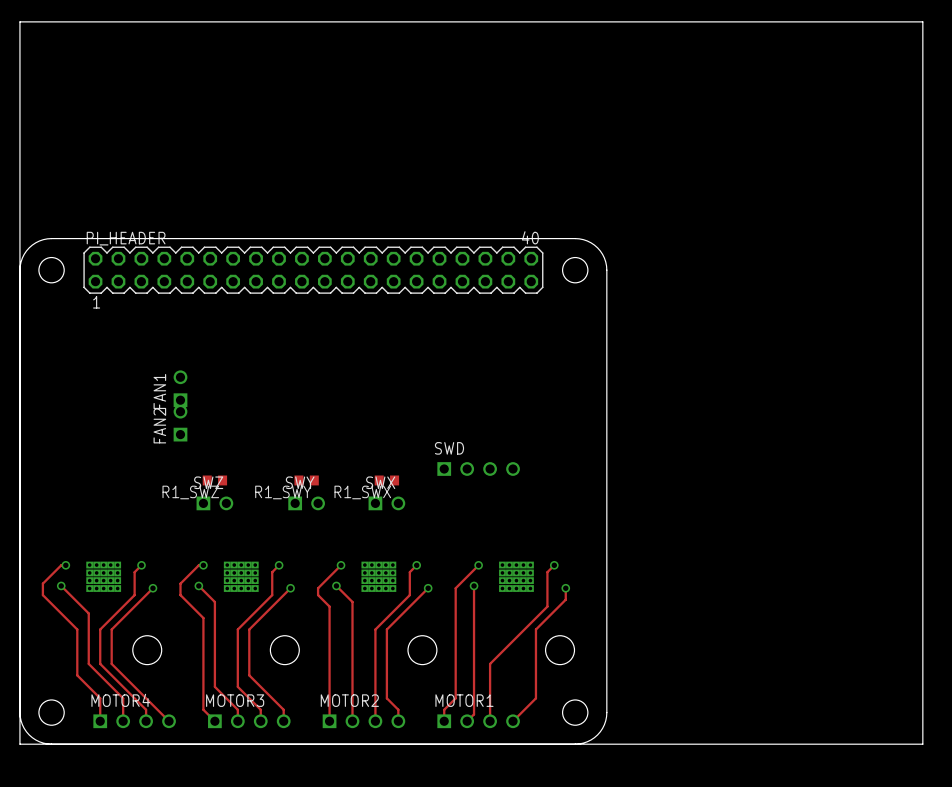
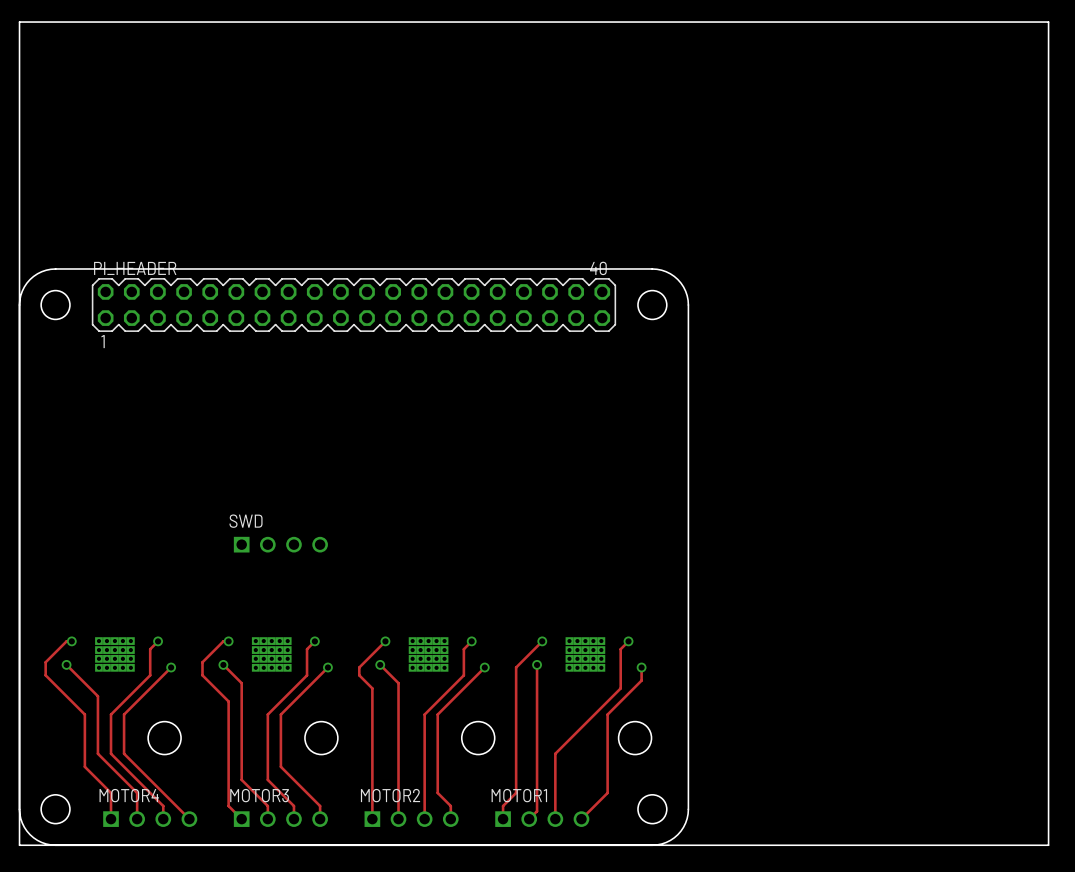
FAN1: (180, 388) -> none
FAN2: (180, 423) -> none
SWD: (478, 468) -> none
R1_SWZ: (214, 480) -> none
SWD: none -> (280, 544)
R1_SWY: (306, 480) -> none
R1_SWX: (386, 480) -> none
SWZ: (214, 503) -> none
SWY: (306, 503) -> none
SWX: (386, 503) -> none

